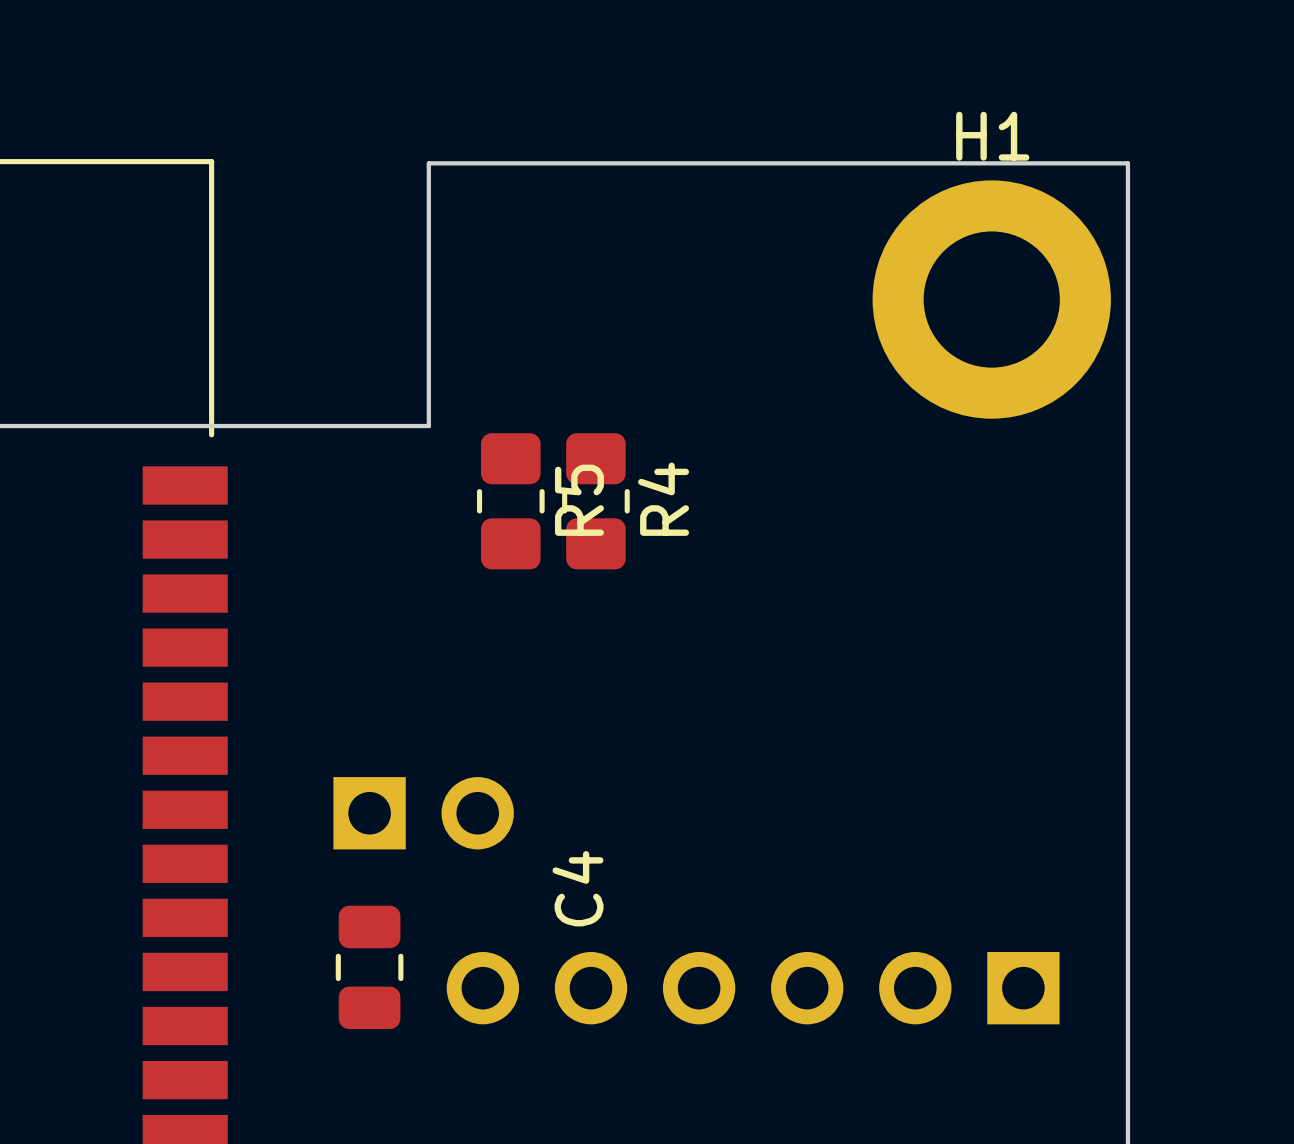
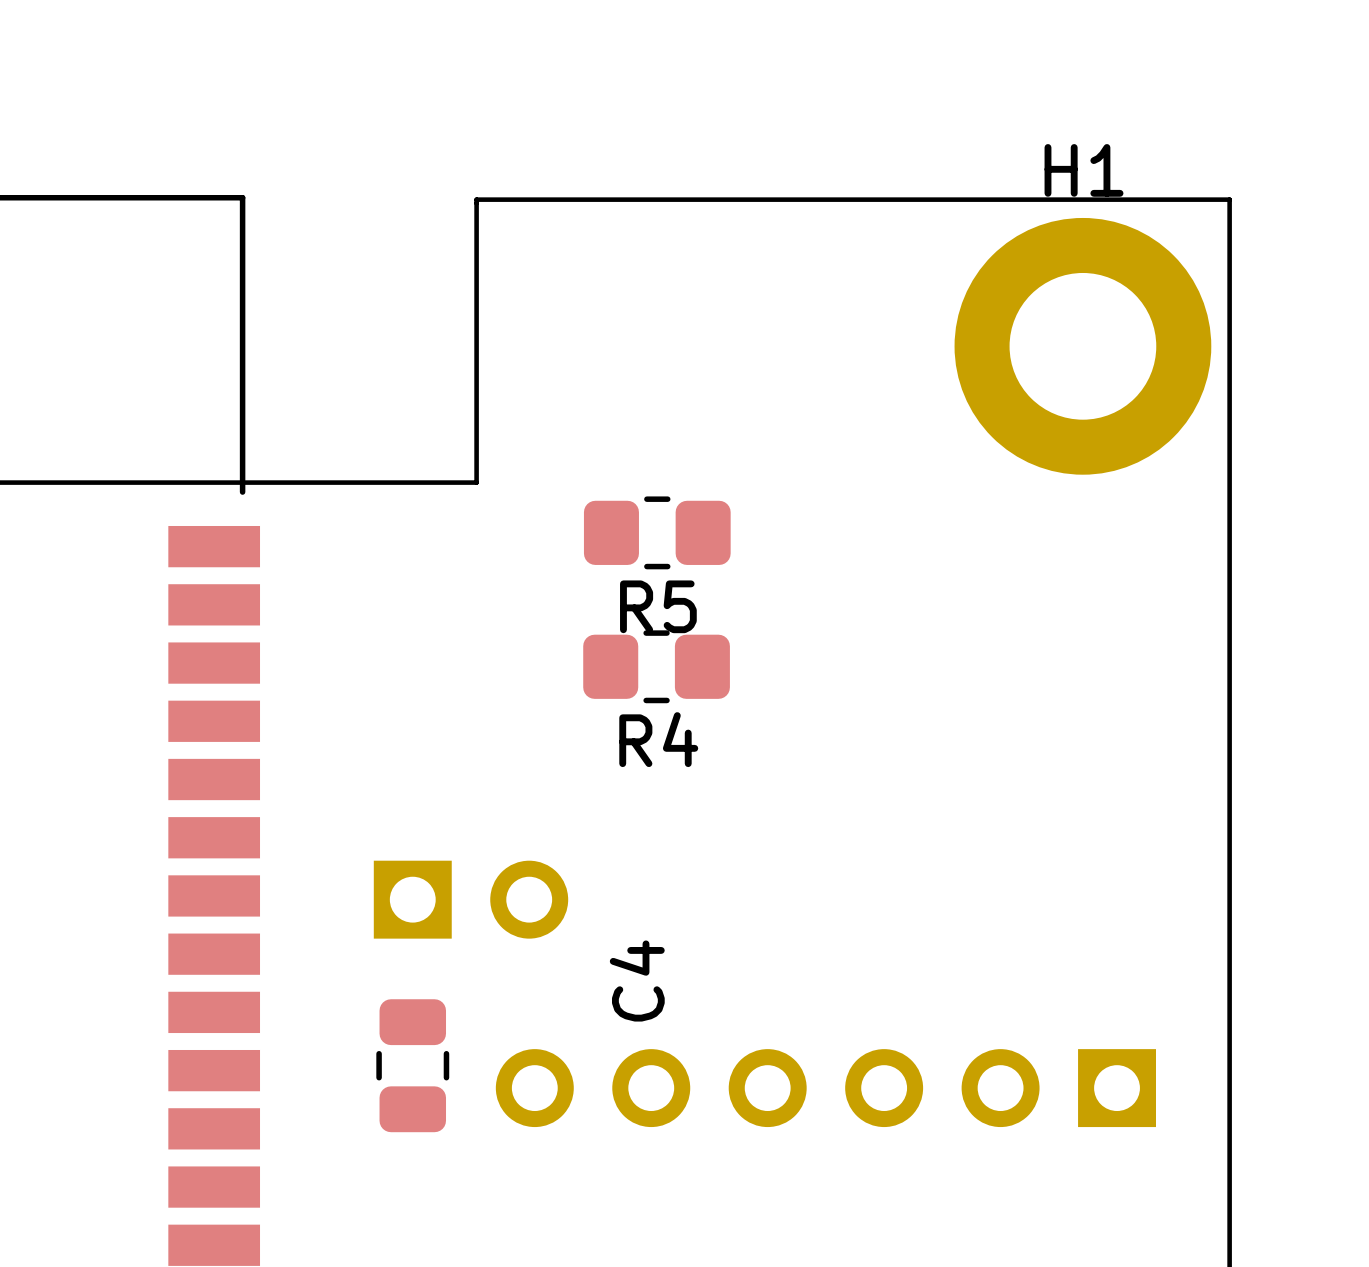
R5 rotation: 0° (510, 501) -> 90° clockwise (657, 532)
R5 position: (510, 501) -> (657, 532)
R4 rotation: 0° (595, 501) -> 90° clockwise (656, 666)
R4 position: (595, 501) -> (656, 666)

